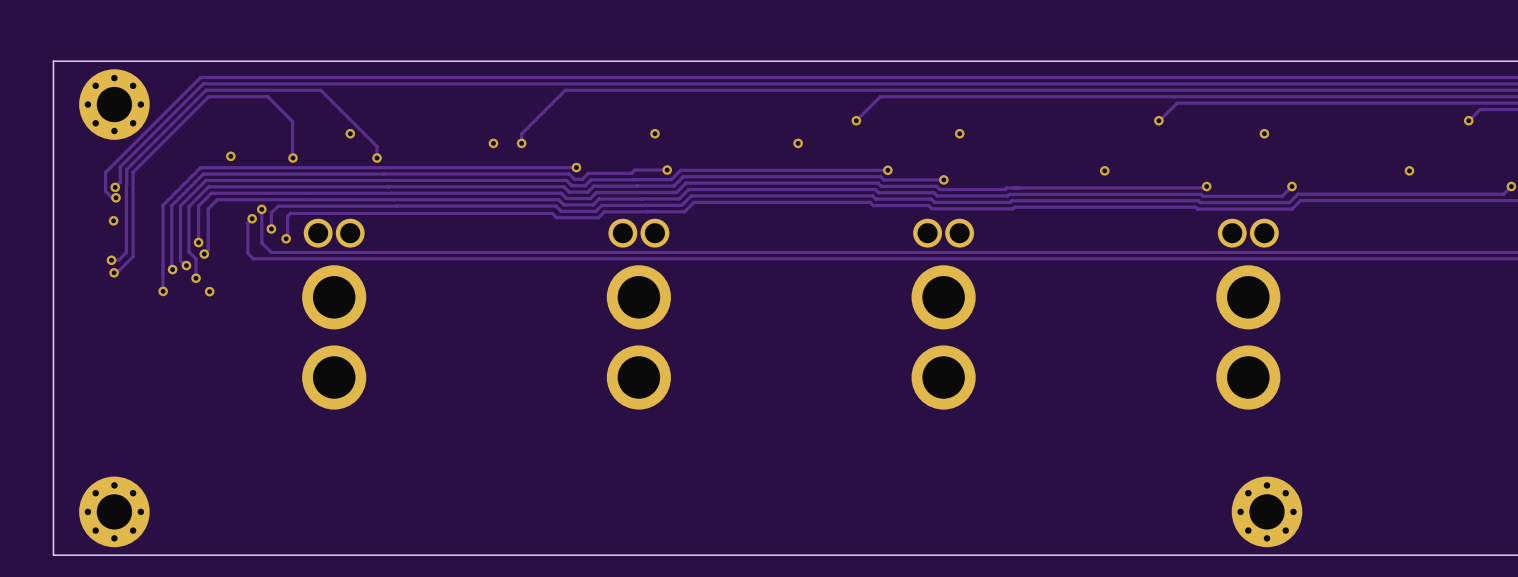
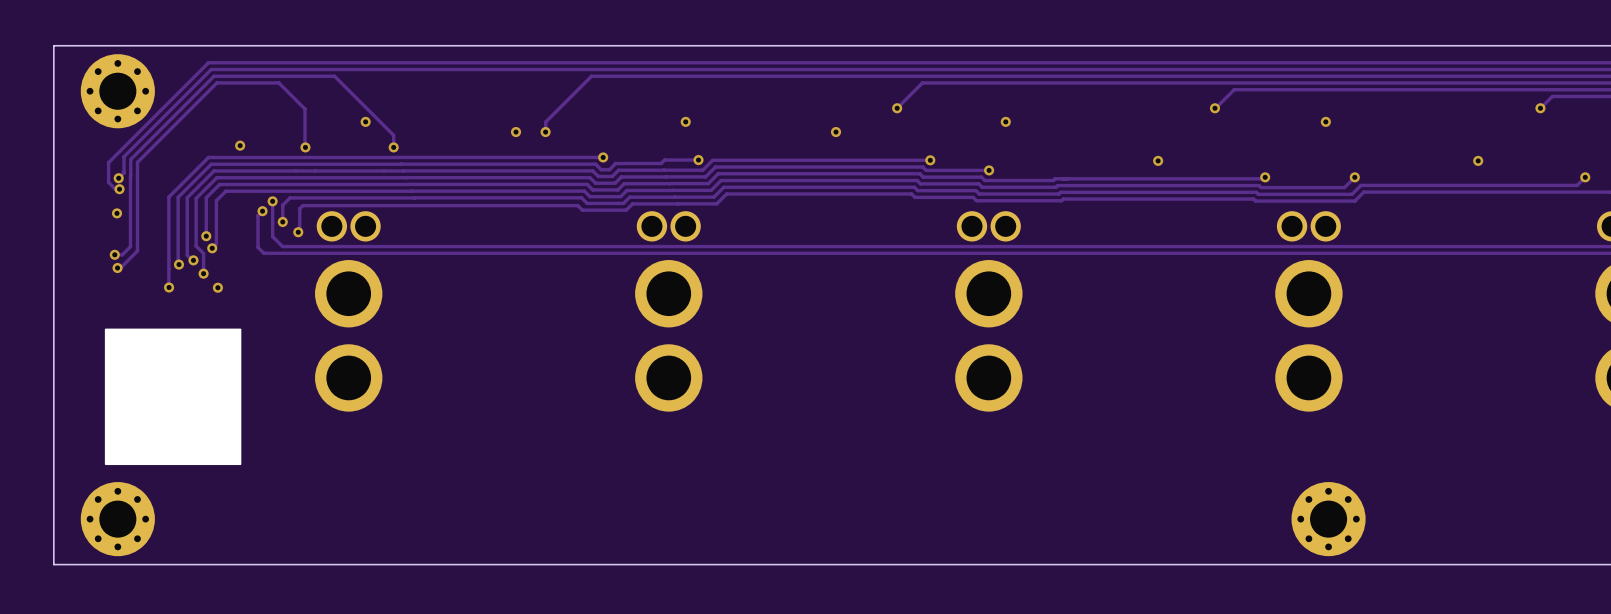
drawing: none -> [104, 328, 242, 466]

